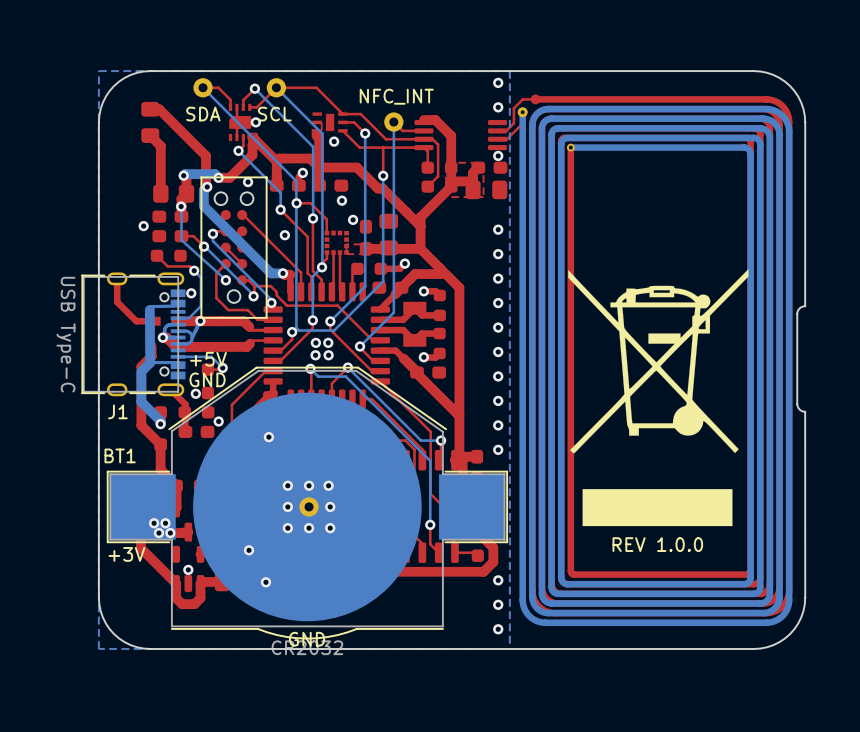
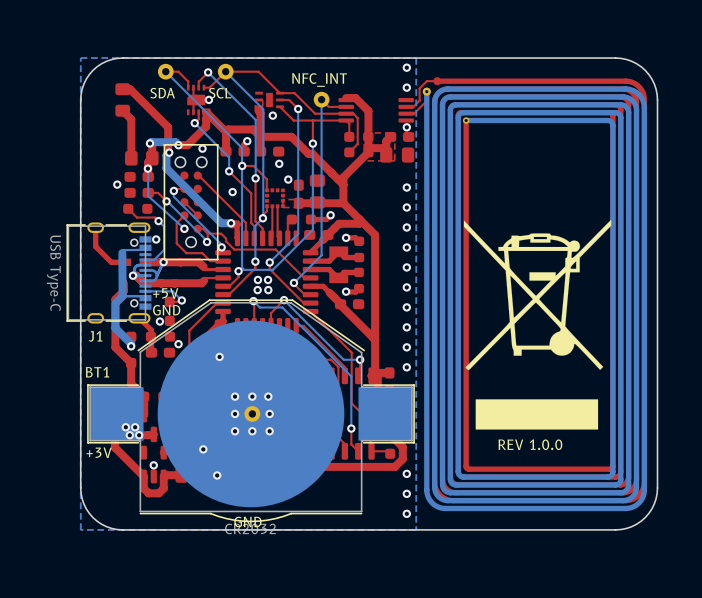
board edge: (805, 122) (805, 306) (799, 308) (797, 314) -> none
board edge: (797, 314) (797, 403) (799, 409) (805, 411) (805, 597) -> (657, 99) (657, 487)

